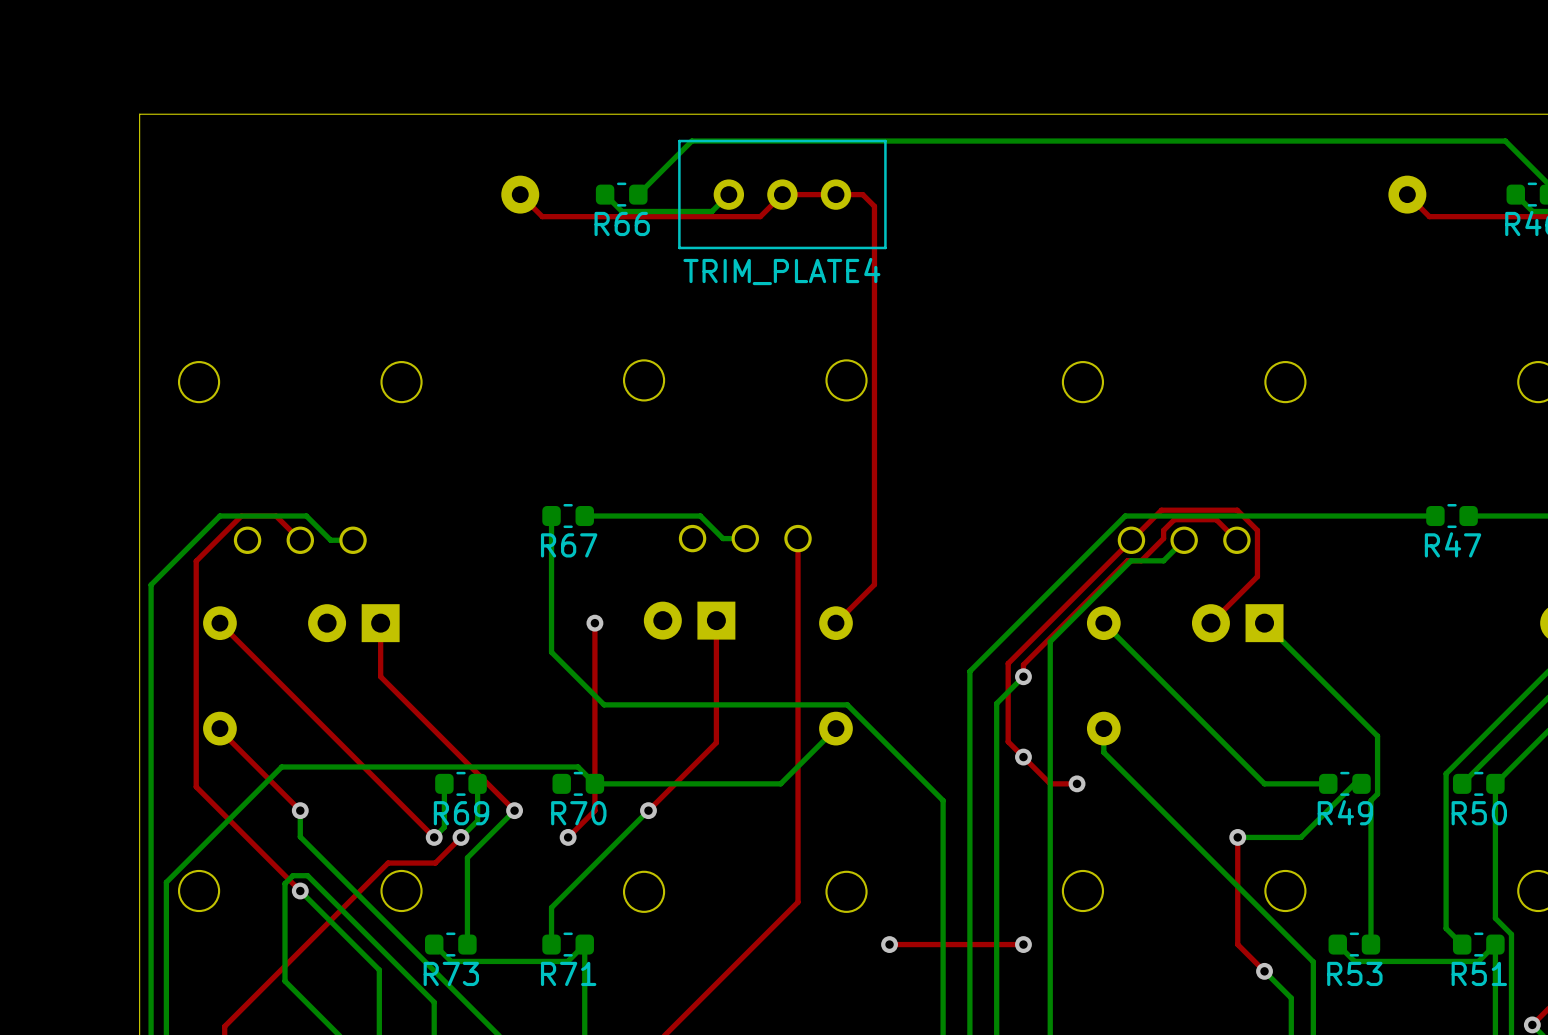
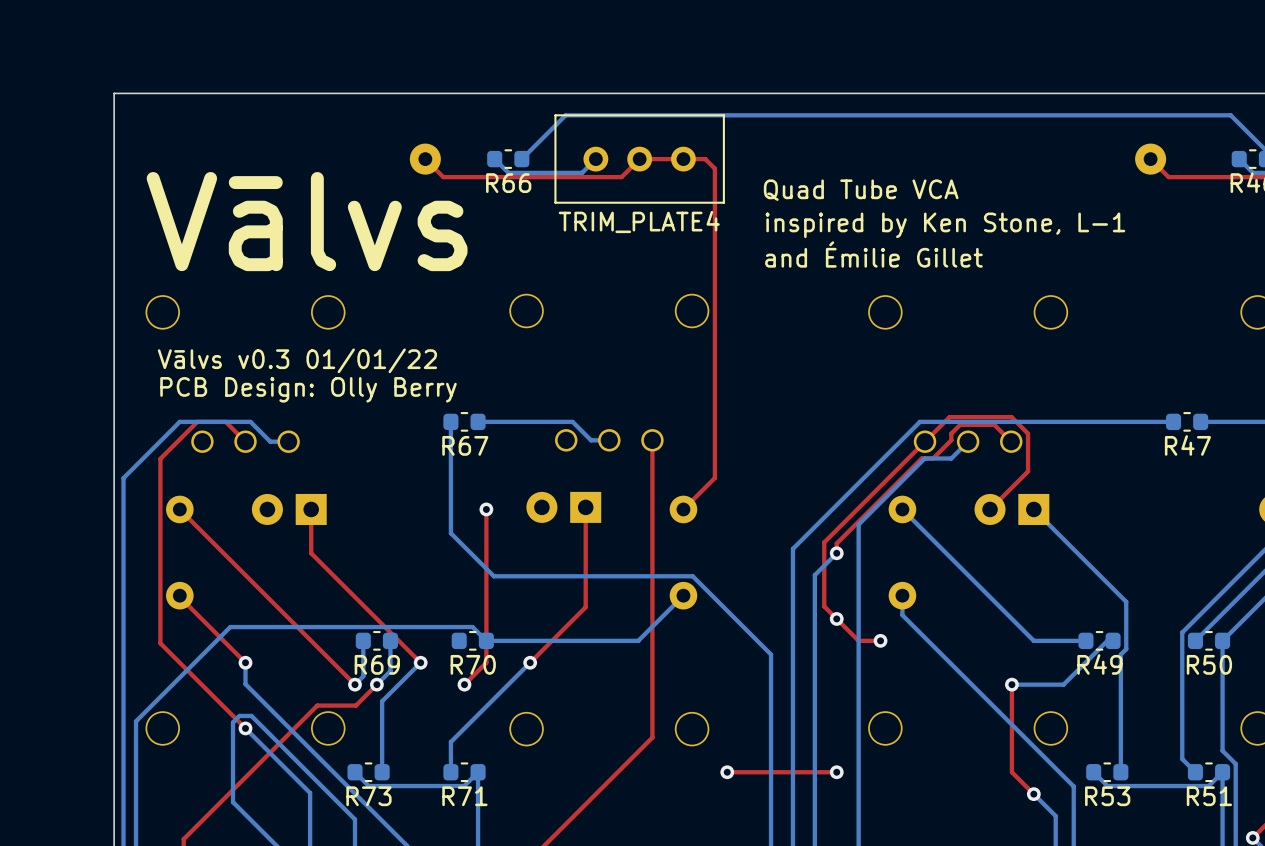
text: none -> Quad Tube VCA (861, 190)
text: none -> Vālvs (307, 221)
text: none -> inspired by Ken Stone, L-1 (945, 225)
text: none -> and Émilie Gillet (873, 254)
text: none -> Vālvs v0.3 01/01/22 (297, 360)
text: none -> PCB Design: Olly Berry (308, 389)

